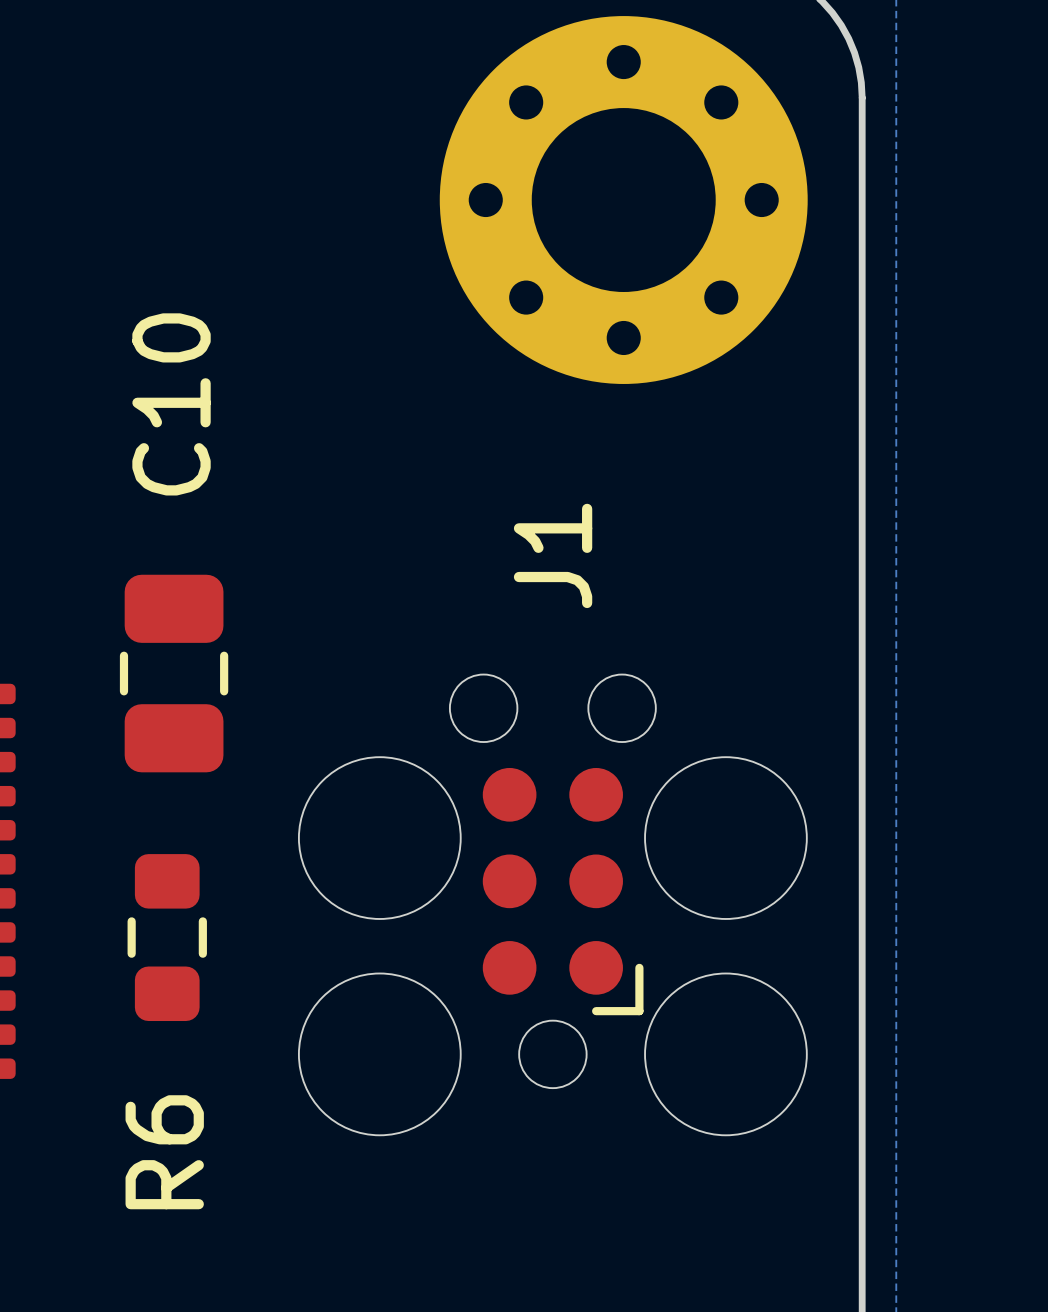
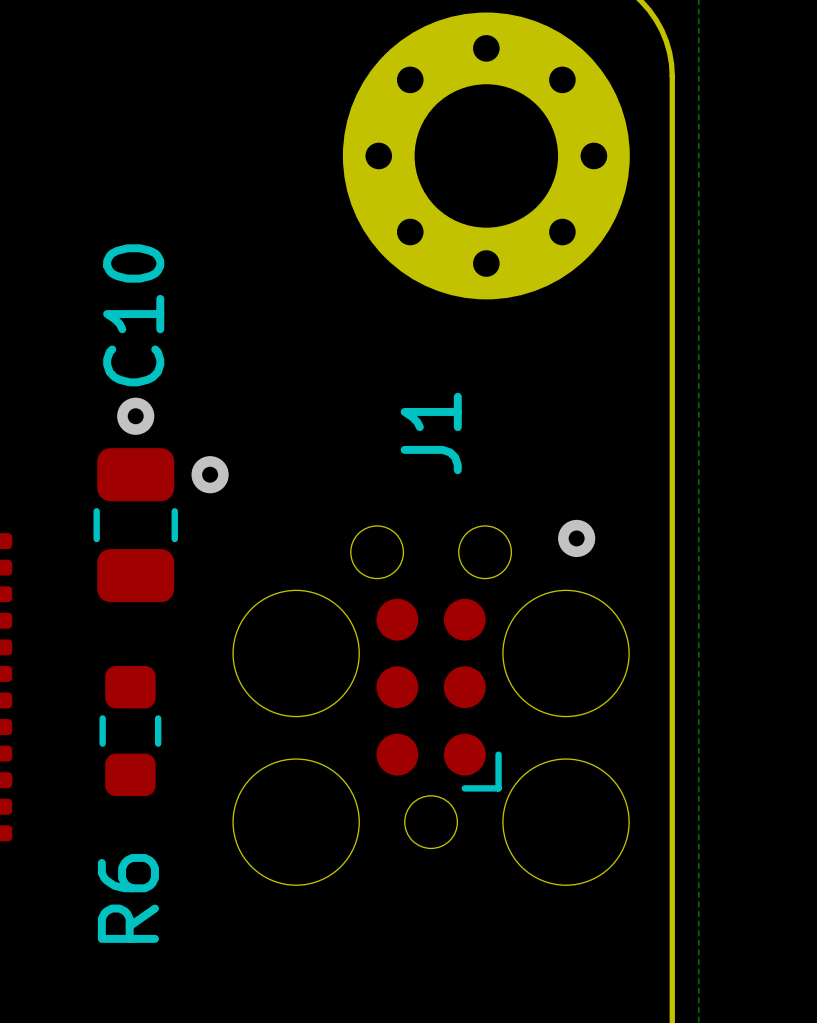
via: none -> (135, 416)
via: none -> (210, 474)
via: none -> (576, 538)

